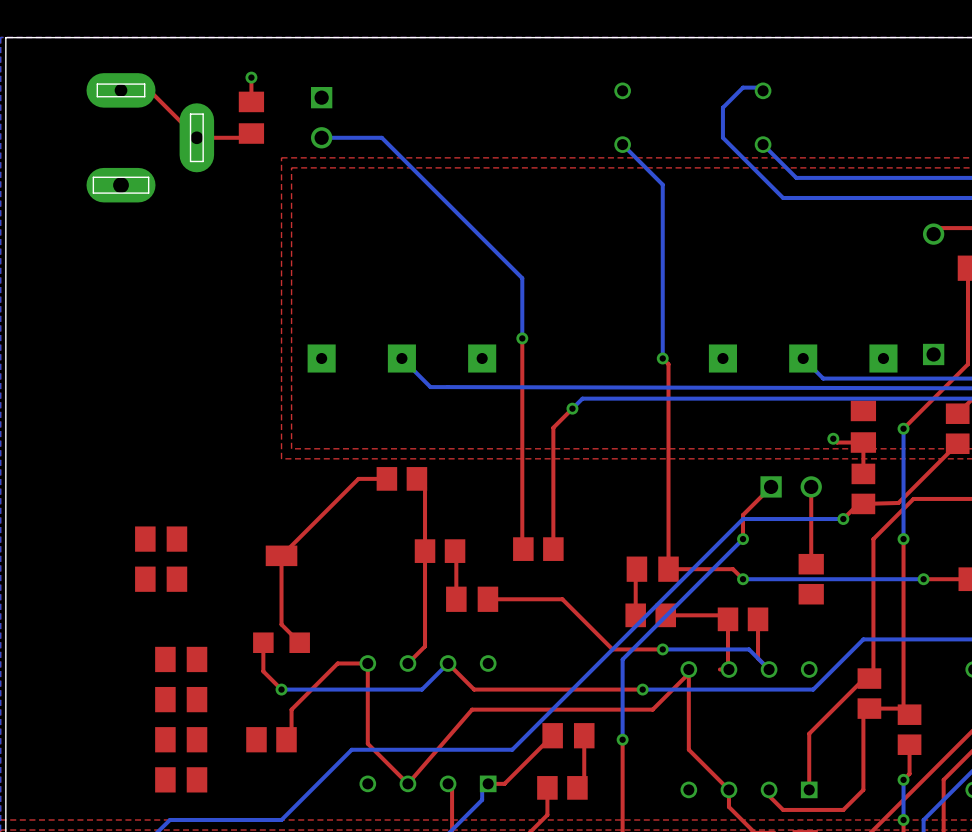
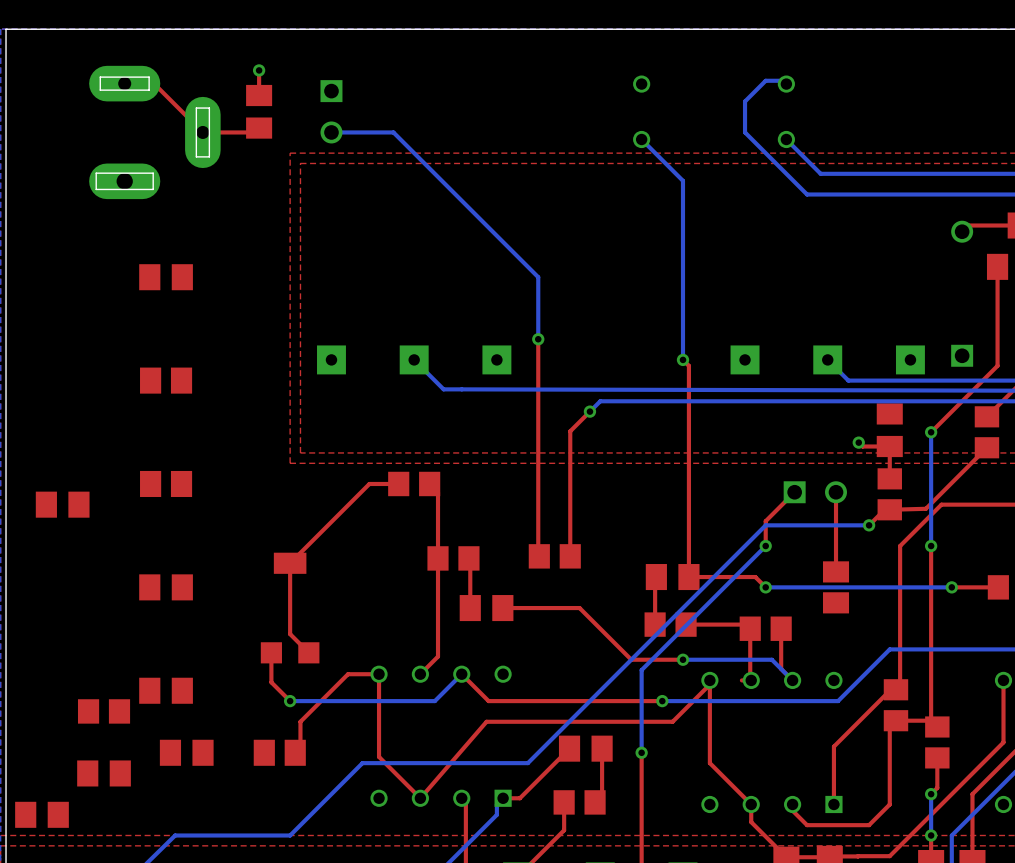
part: none -> (166, 277)
part: none -> (166, 380)
part: none -> (166, 483)
part: none -> (62, 504)
part: (161, 539) -> none
part: (181, 659) -> none
part: none -> (166, 690)
part: none -> (104, 711)
part: (181, 699) -> none
part: none -> (104, 773)
part: (181, 779) -> none
part: none -> (41, 814)

